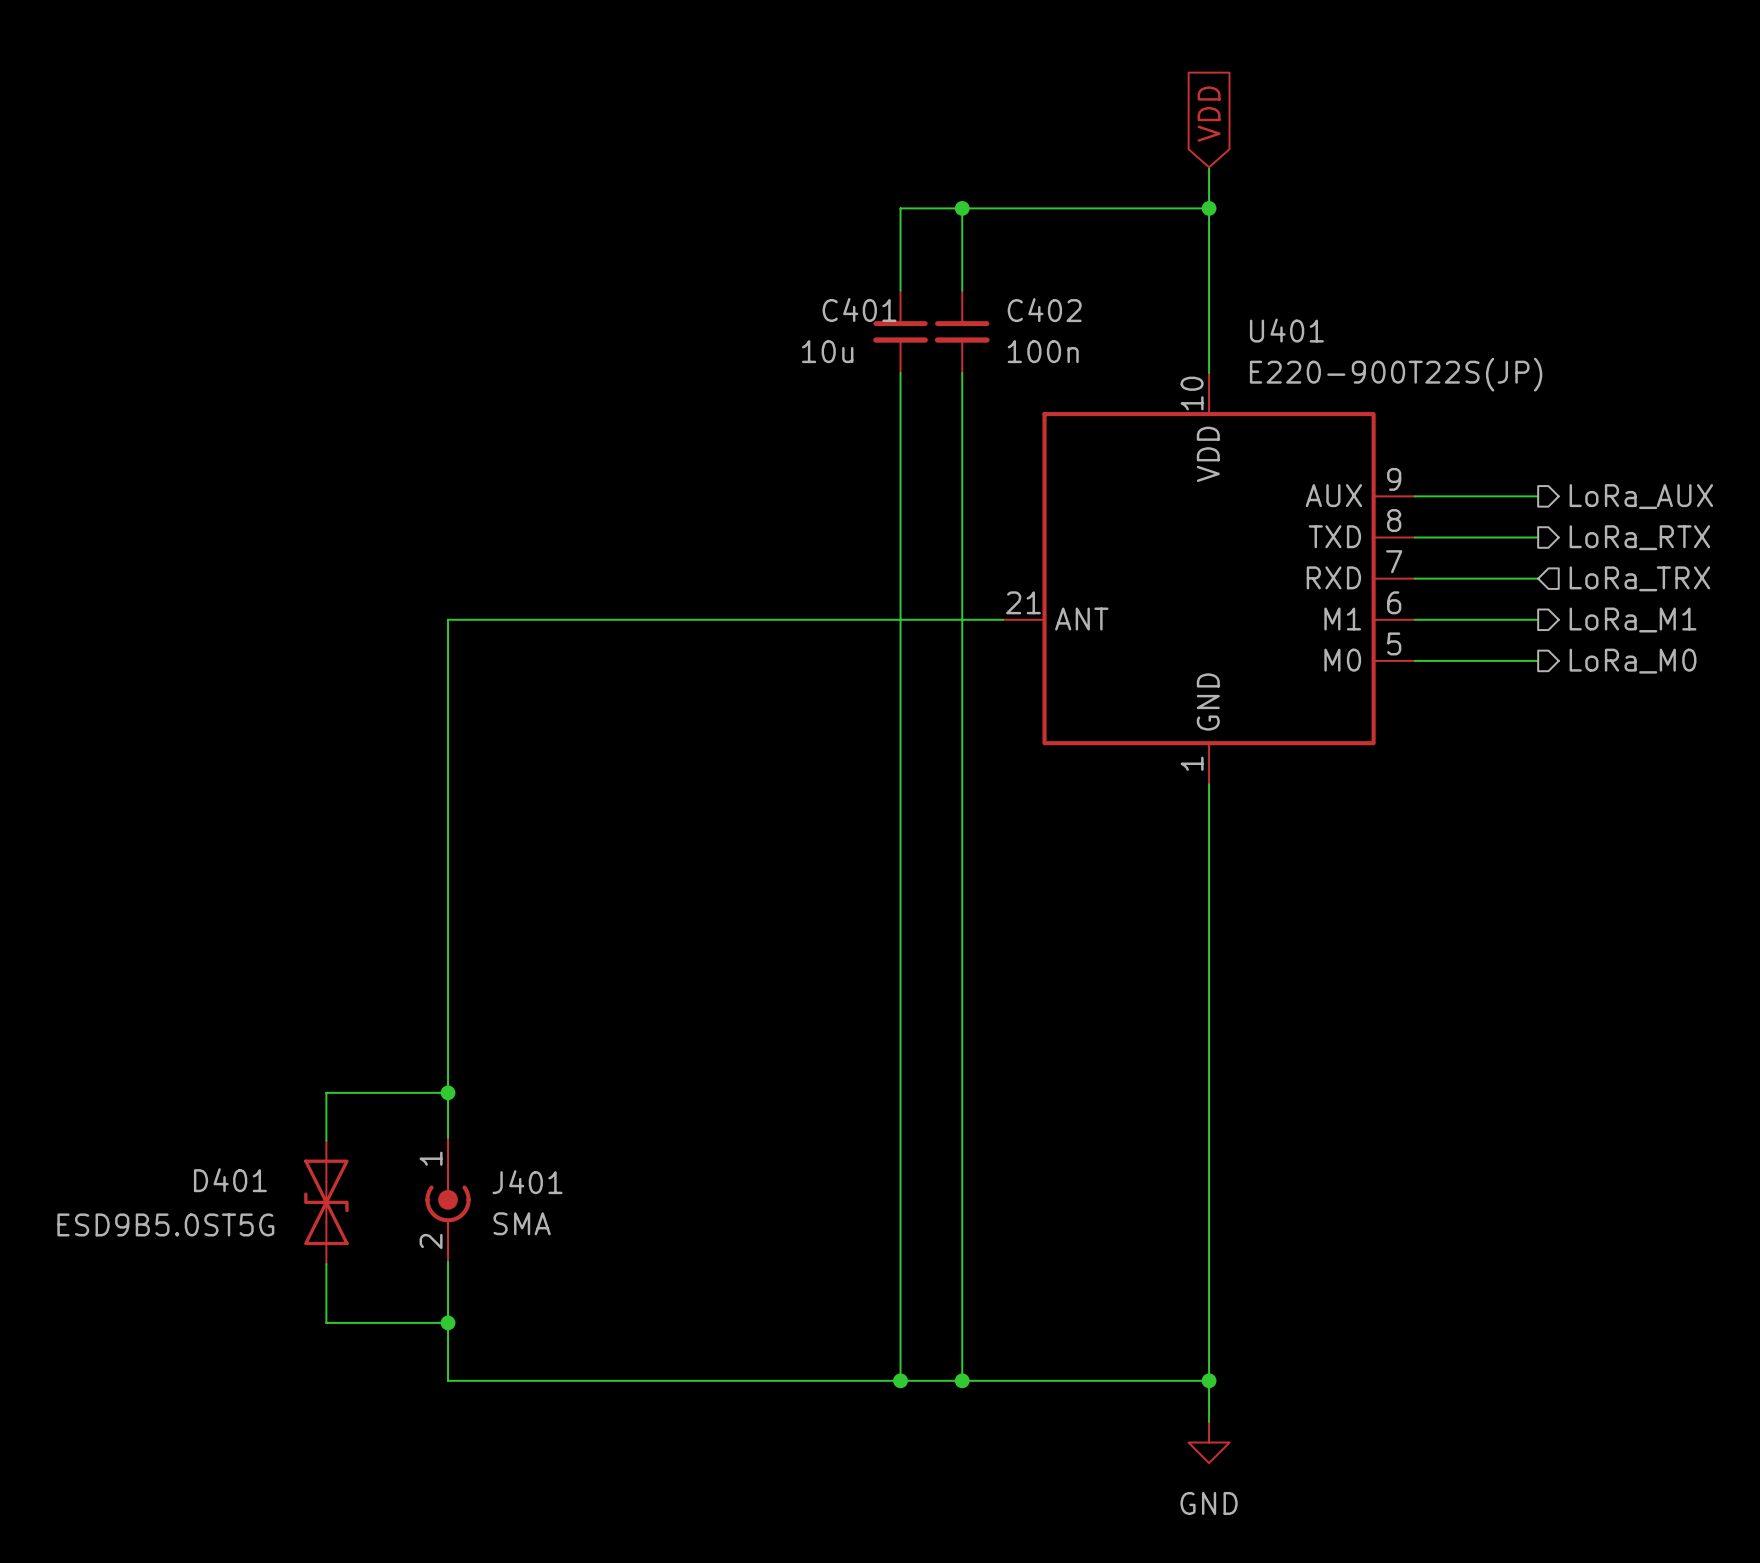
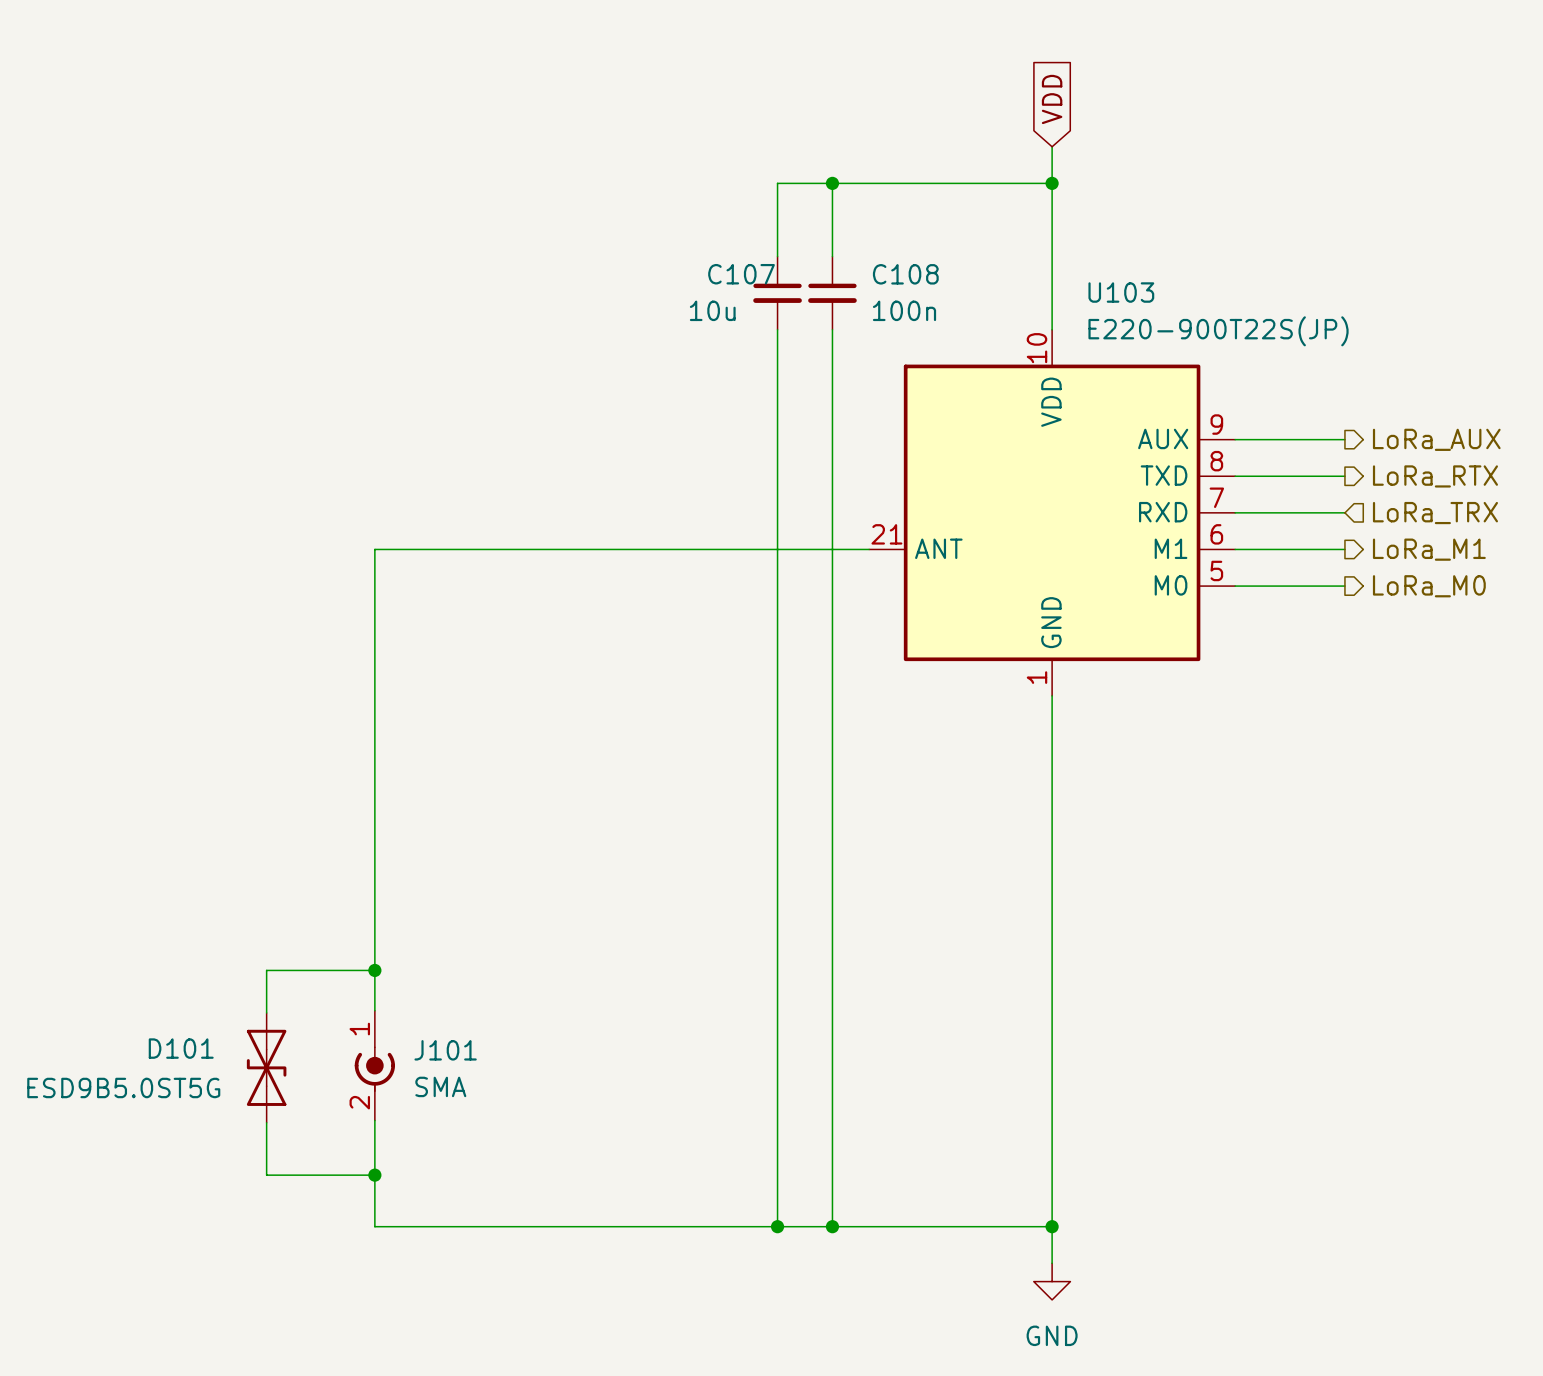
C401 name: C401 (859, 309) -> C107 (741, 274)
C402 name: C402 (1044, 310) -> C108 (905, 274)
U401 name: U401 (1286, 330) -> U103 (1121, 292)
D401 name: D401 (230, 1180) -> D101 (181, 1048)
J401 name: J401 (527, 1182) -> J101 (445, 1050)

